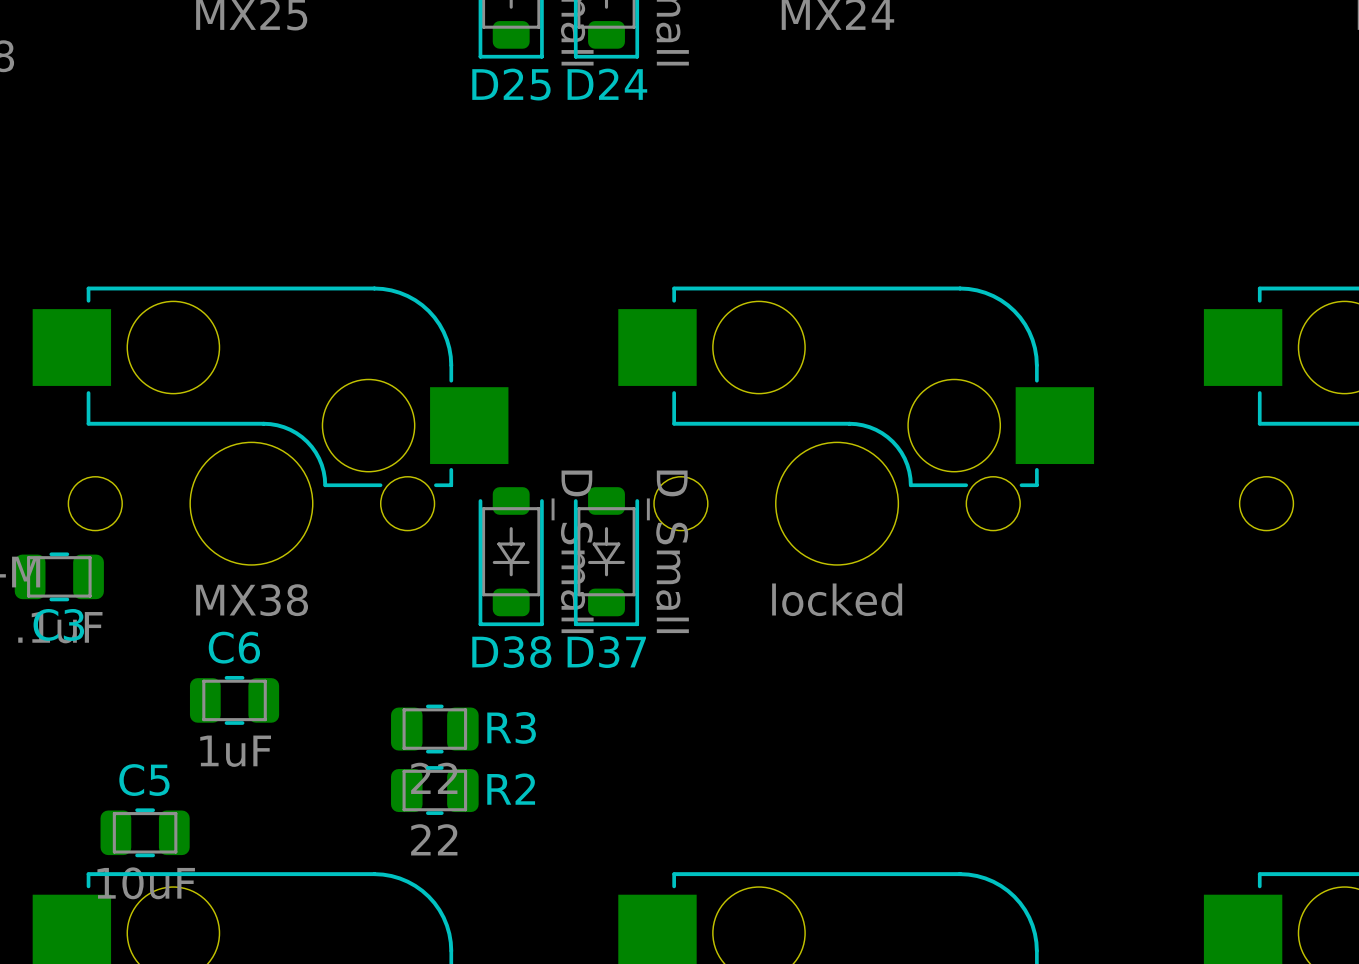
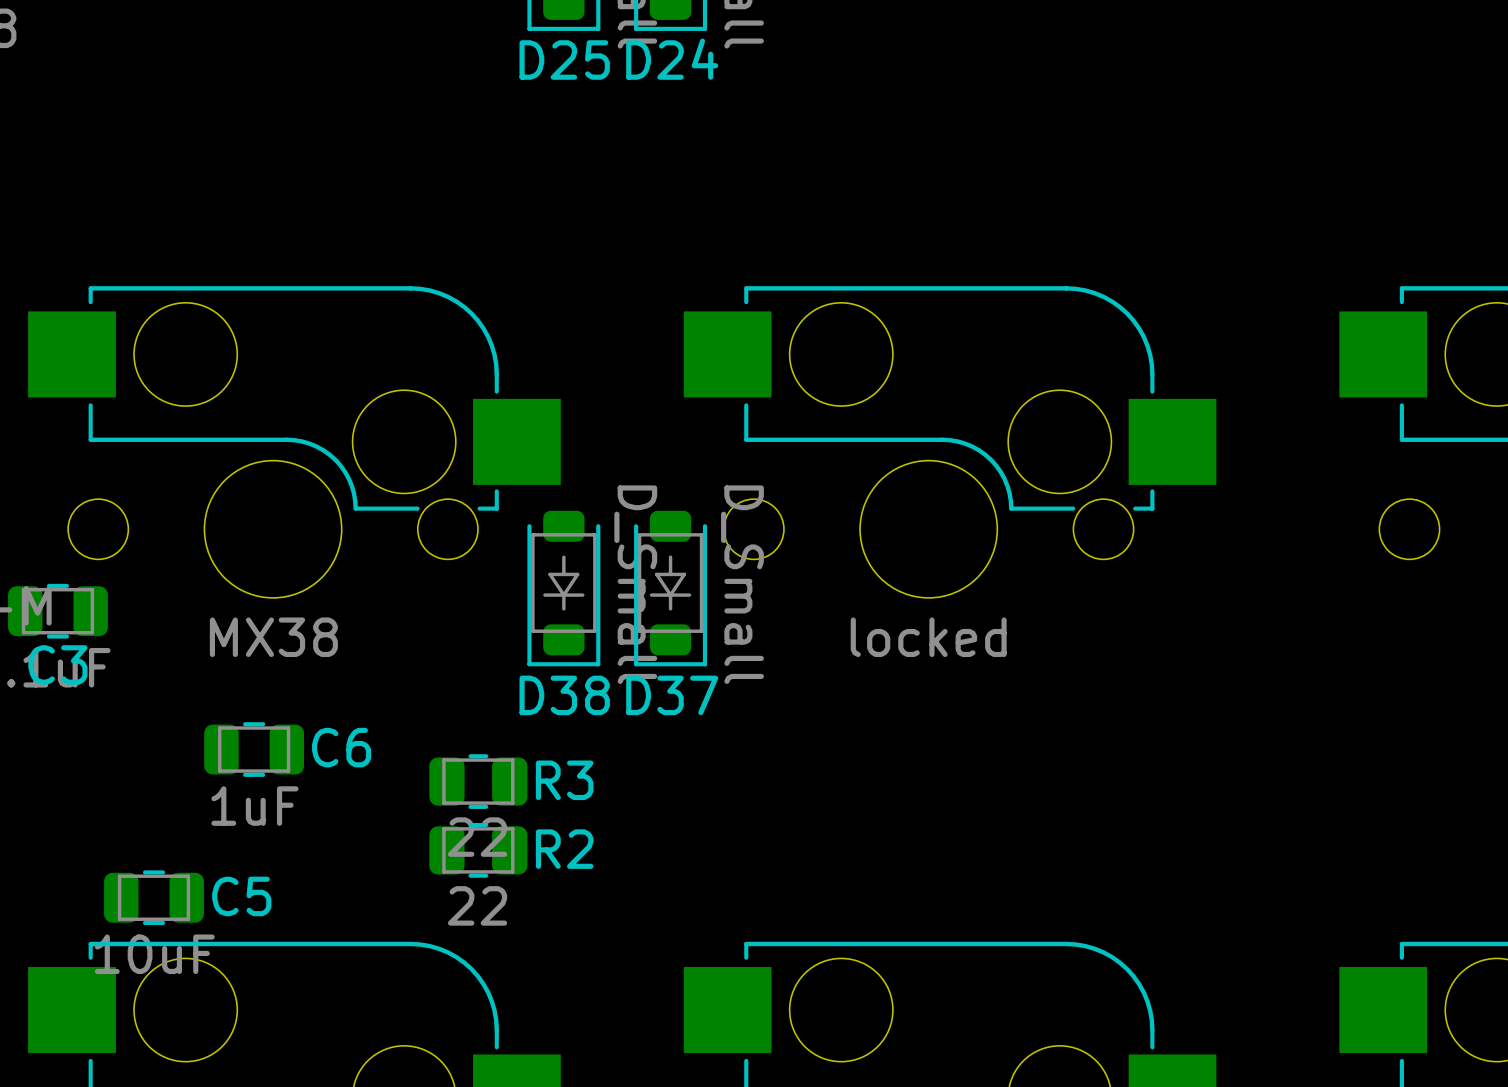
C6 name position: C6 (234, 647) -> C6 (341, 747)
C5 name position: C5 (144, 780) -> C5 (241, 896)

